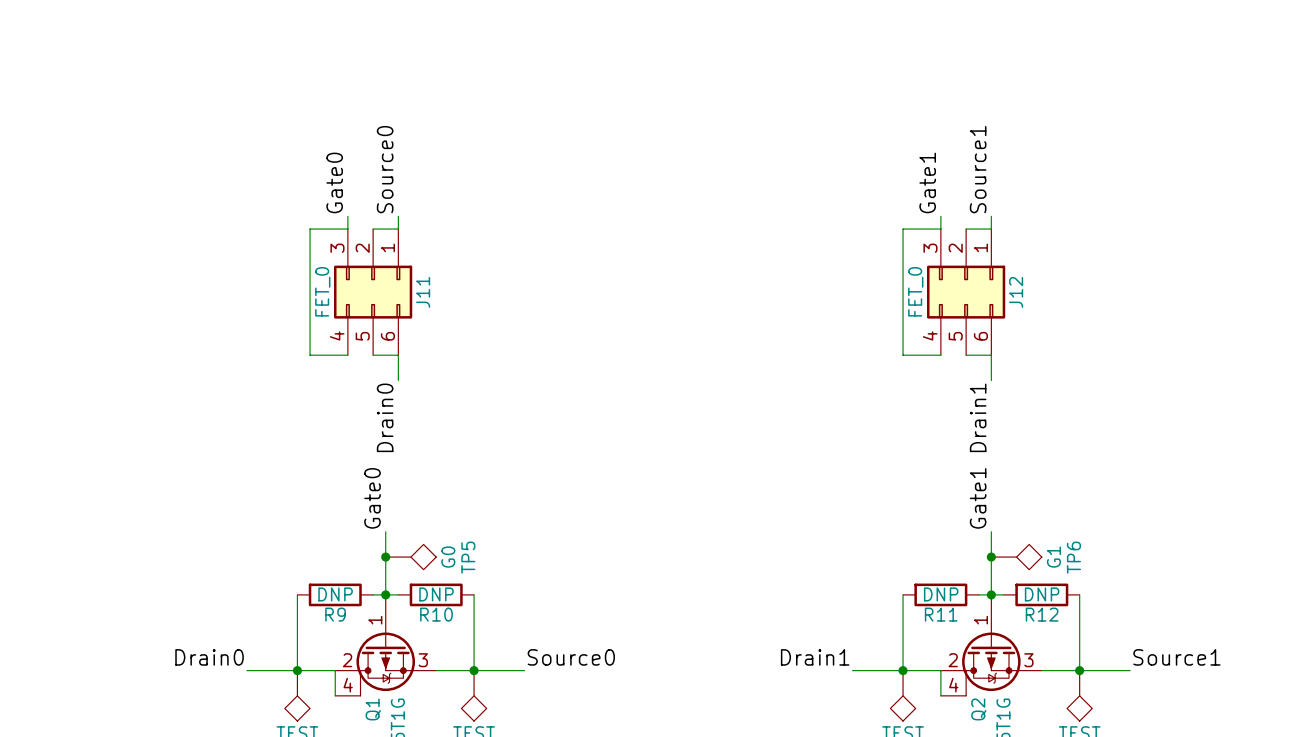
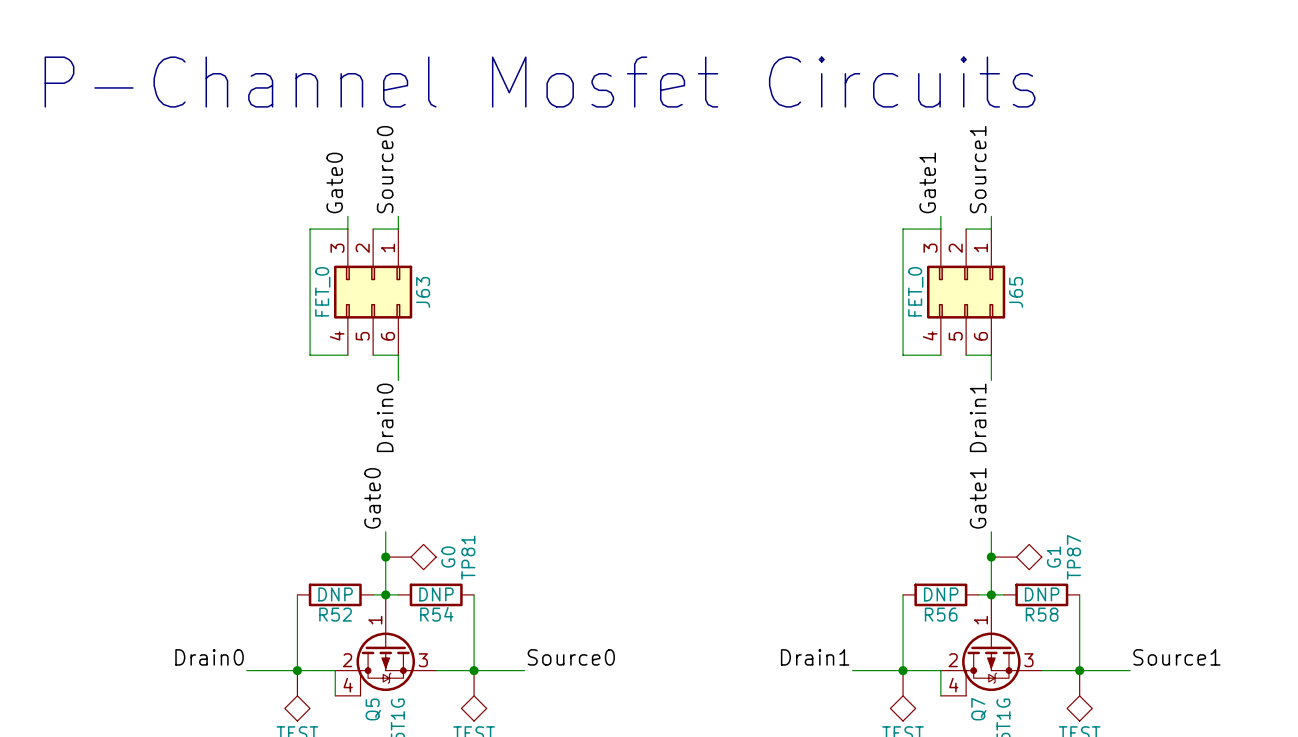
text: none -> P-Channel Mosfet Circuits (540, 82)
J11 name: J11 (423, 292) -> J63 (423, 292)
J12 name: J12 (1016, 292) -> J65 (1016, 292)
TP5 name: TP5 (468, 557) -> TP81 (468, 557)
TP6 name: TP6 (1073, 557) -> TP87 (1073, 557)
R9 name: R9 (335, 614) -> R52 (335, 614)
R10 name: R10 (436, 614) -> R54 (436, 614)
R11 name: R11 (941, 614) -> R56 (941, 614)
R12 name: R12 (1042, 614) -> R58 (1042, 614)
Q1 name: Q1 (373, 709) -> Q5 (373, 709)
Q2 name: Q2 (978, 709) -> Q7 (978, 709)

